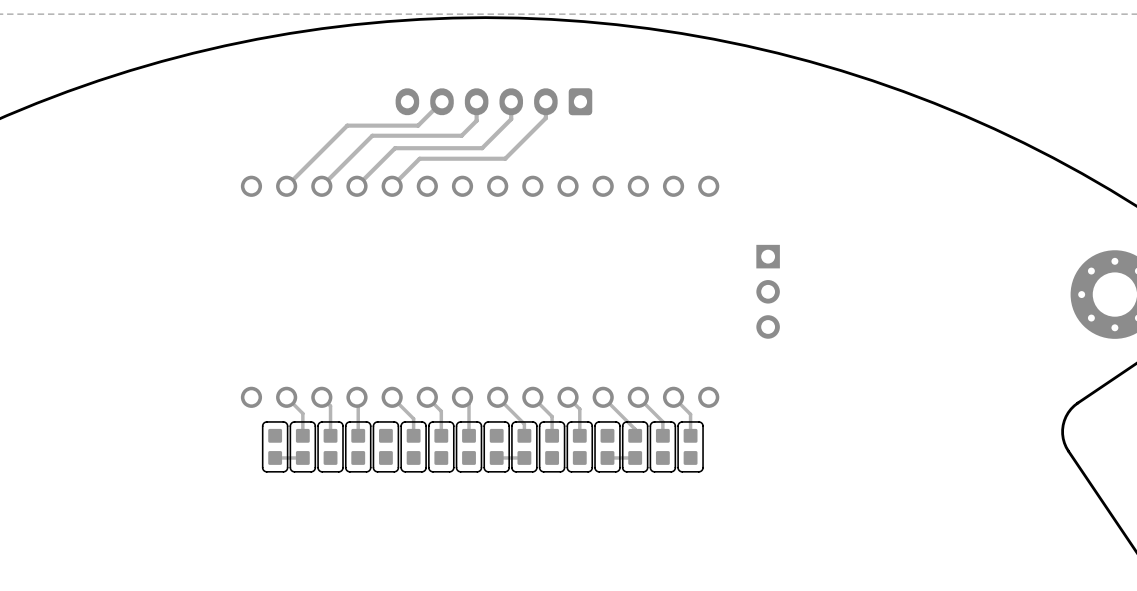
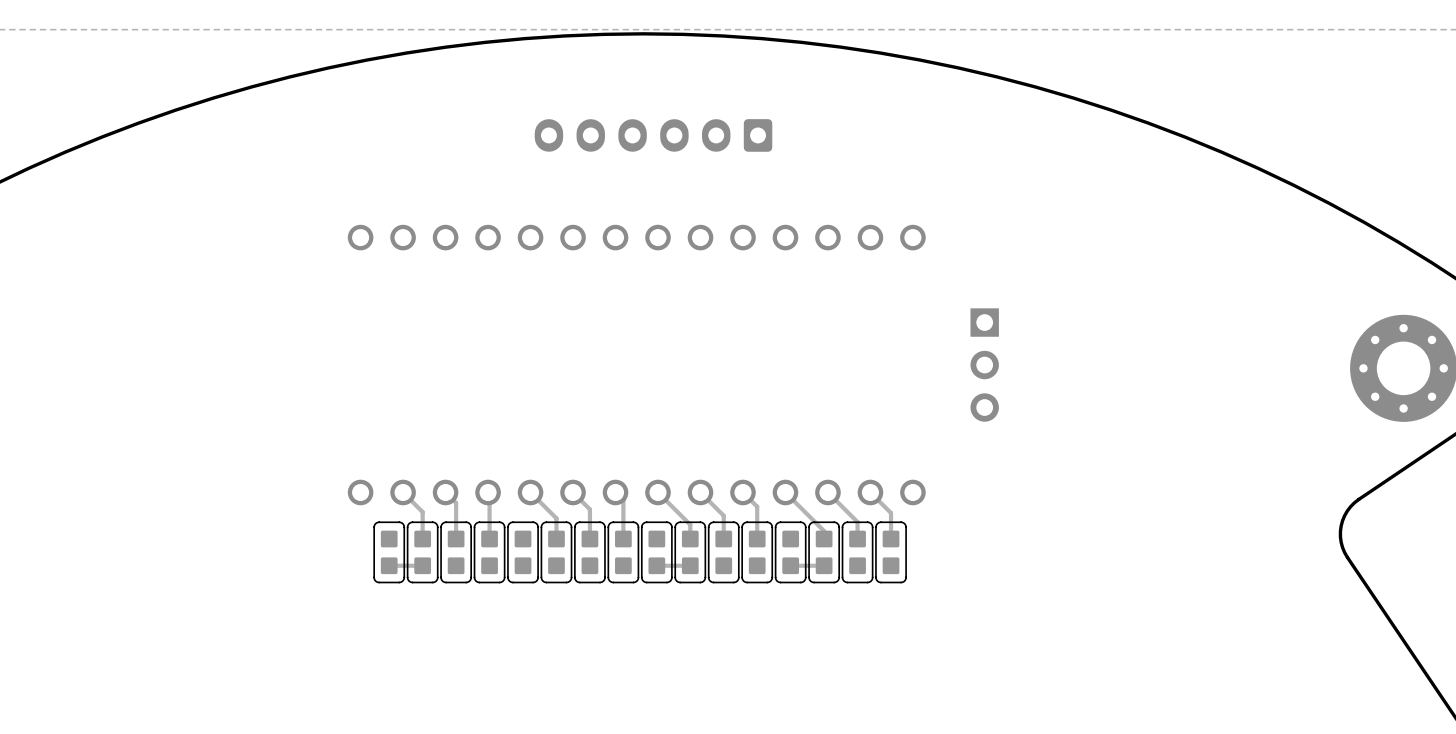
track: (442, 101) (418, 125) (347, 125) (286, 186) -> none
track: (476, 101) (476, 120) (461, 135) (372, 135) (321, 186) -> none
track: (511, 101) (511, 119) (482, 148) (395, 148) (356, 186) -> none
track: (545, 101) (545, 118) (505, 158) (419, 158) (392, 186) -> none

